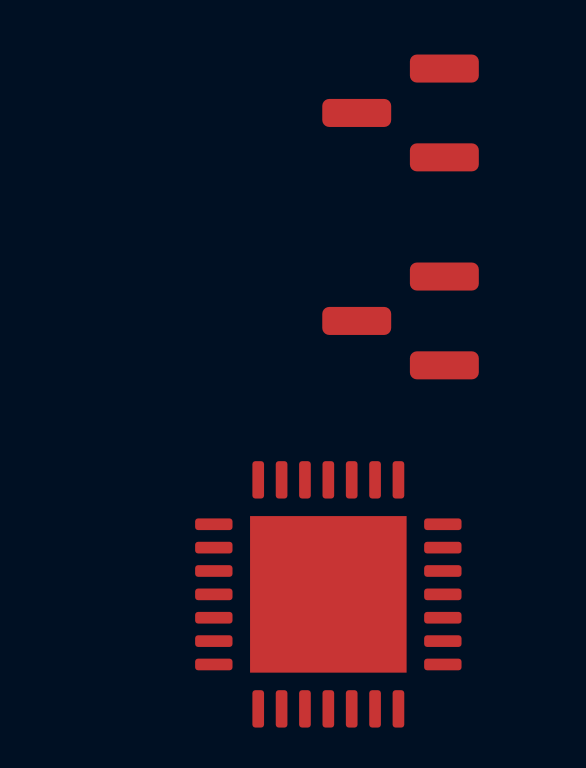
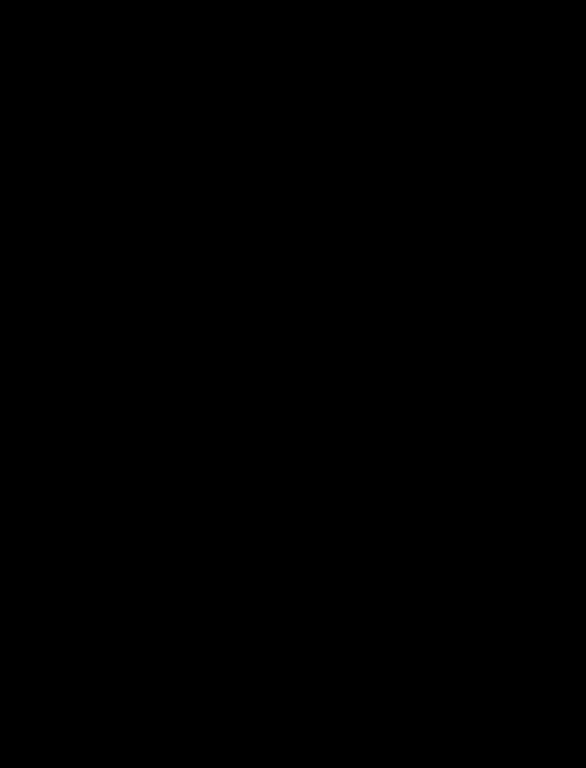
part: (400, 112) -> none
part: (400, 320) -> none
part: (328, 594) -> none

